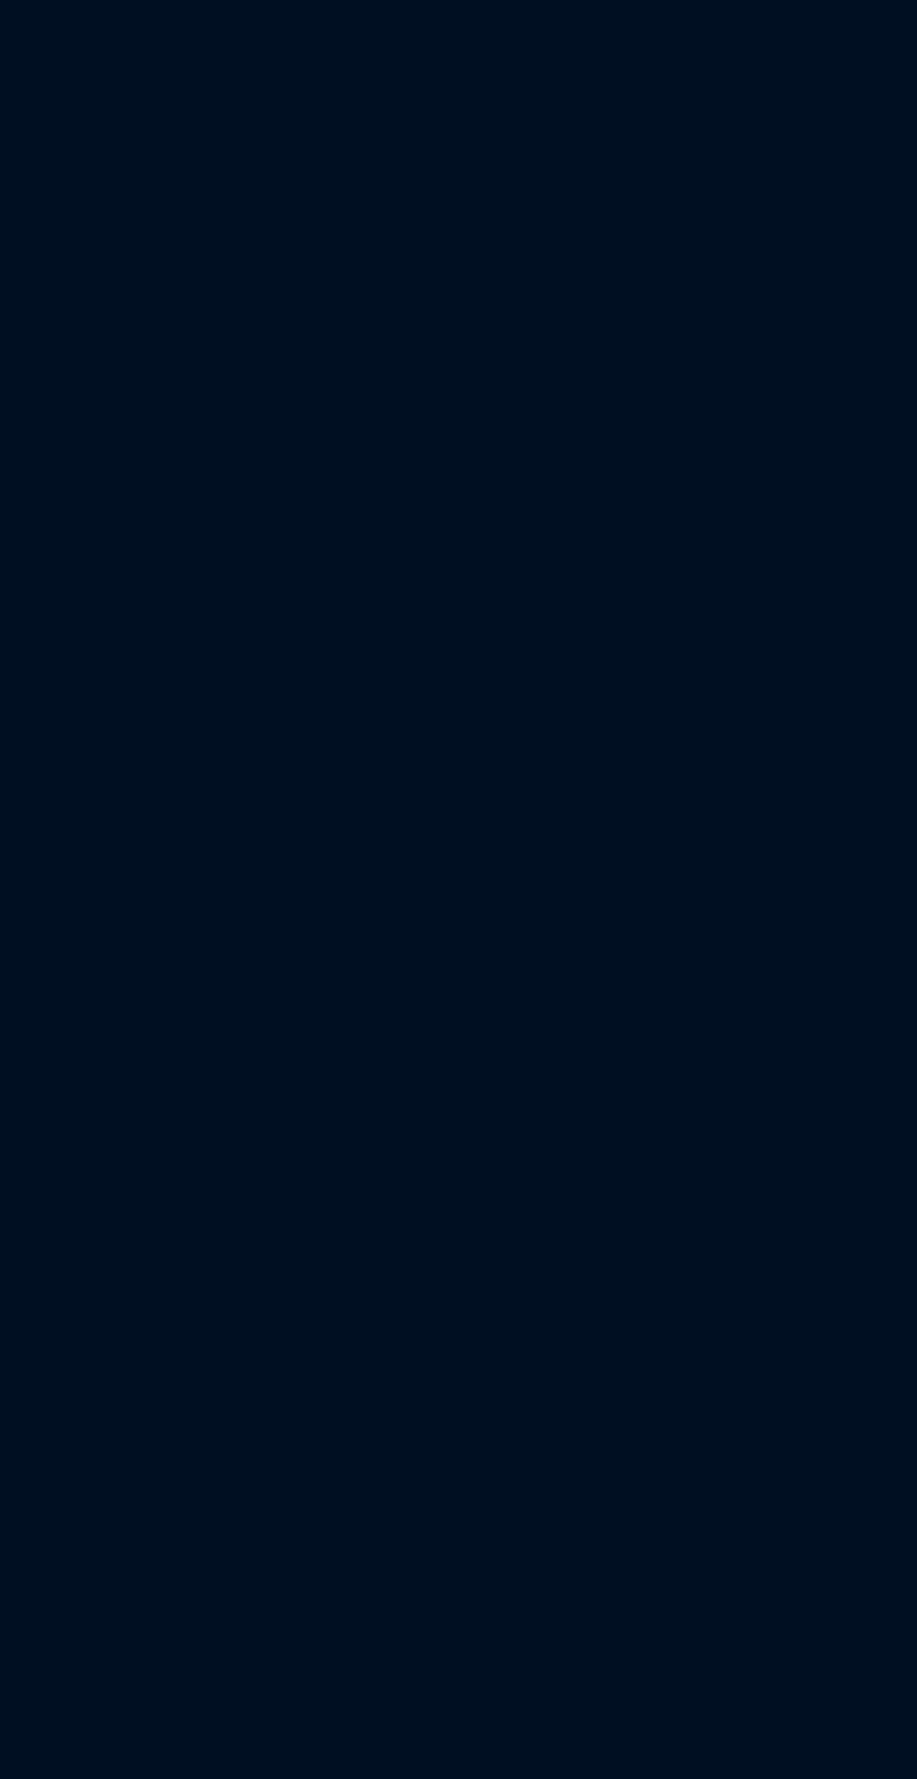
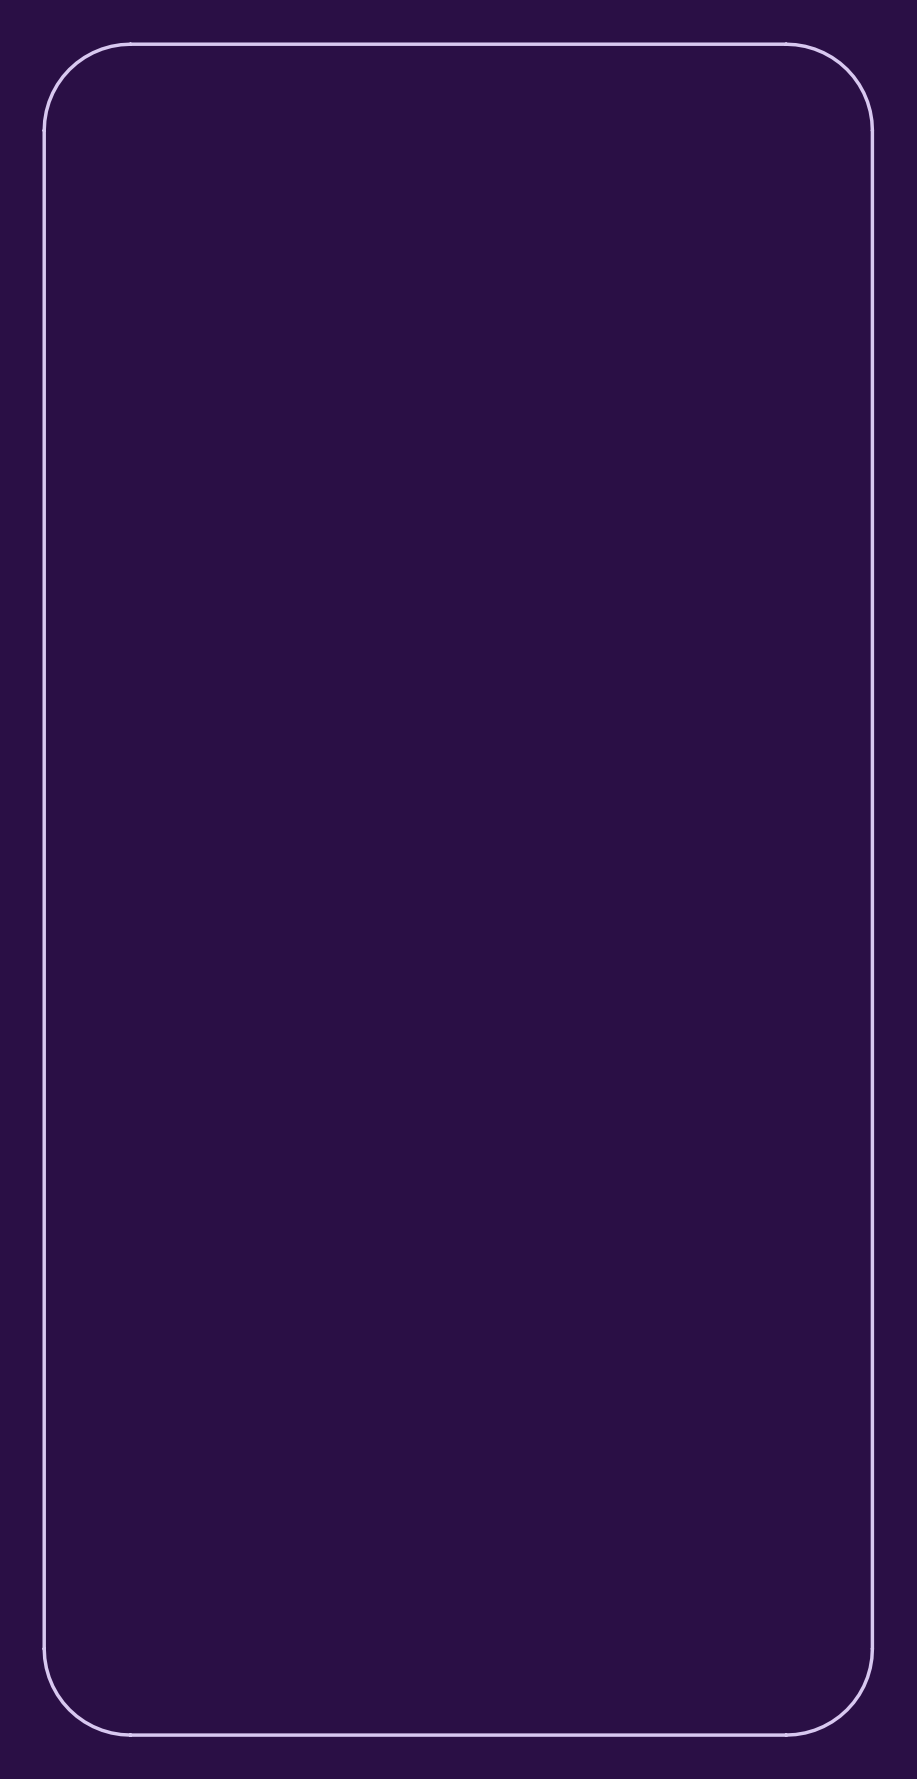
board edge: none -> (130, 44) (795, 44) (823, 52) (839, 63) (853, 76) (867, 101) (872, 130) (872, 1648) (867, 1677) (853, 1702) (839, 1716) (814, 1730) (786, 1735) (120, 1734) (93, 1726) (76, 1716) (63, 1702) (49, 1677) (44, 1648) (44, 130) (46, 111) (52, 93) (69, 69) (93, 52) (111, 46) (130, 44)

